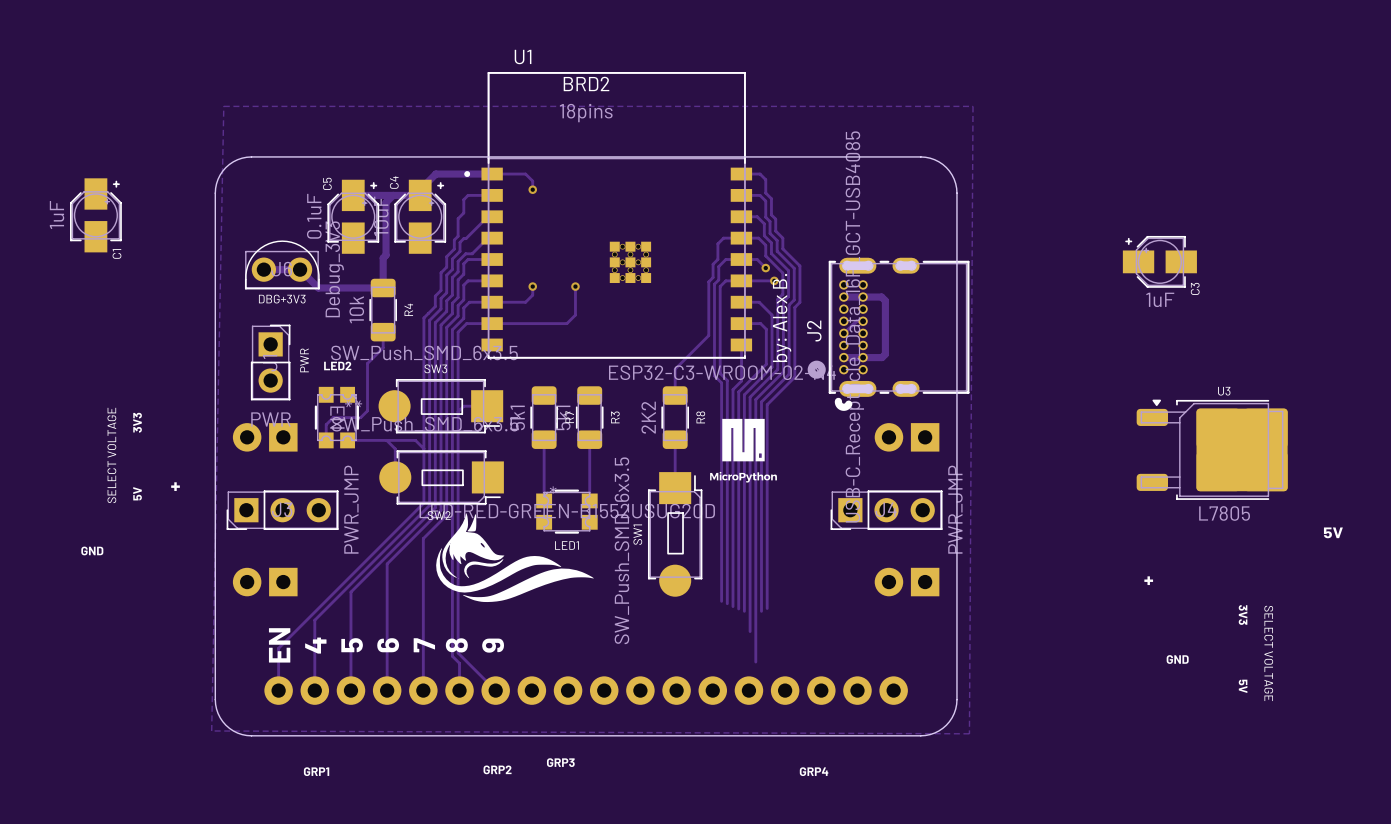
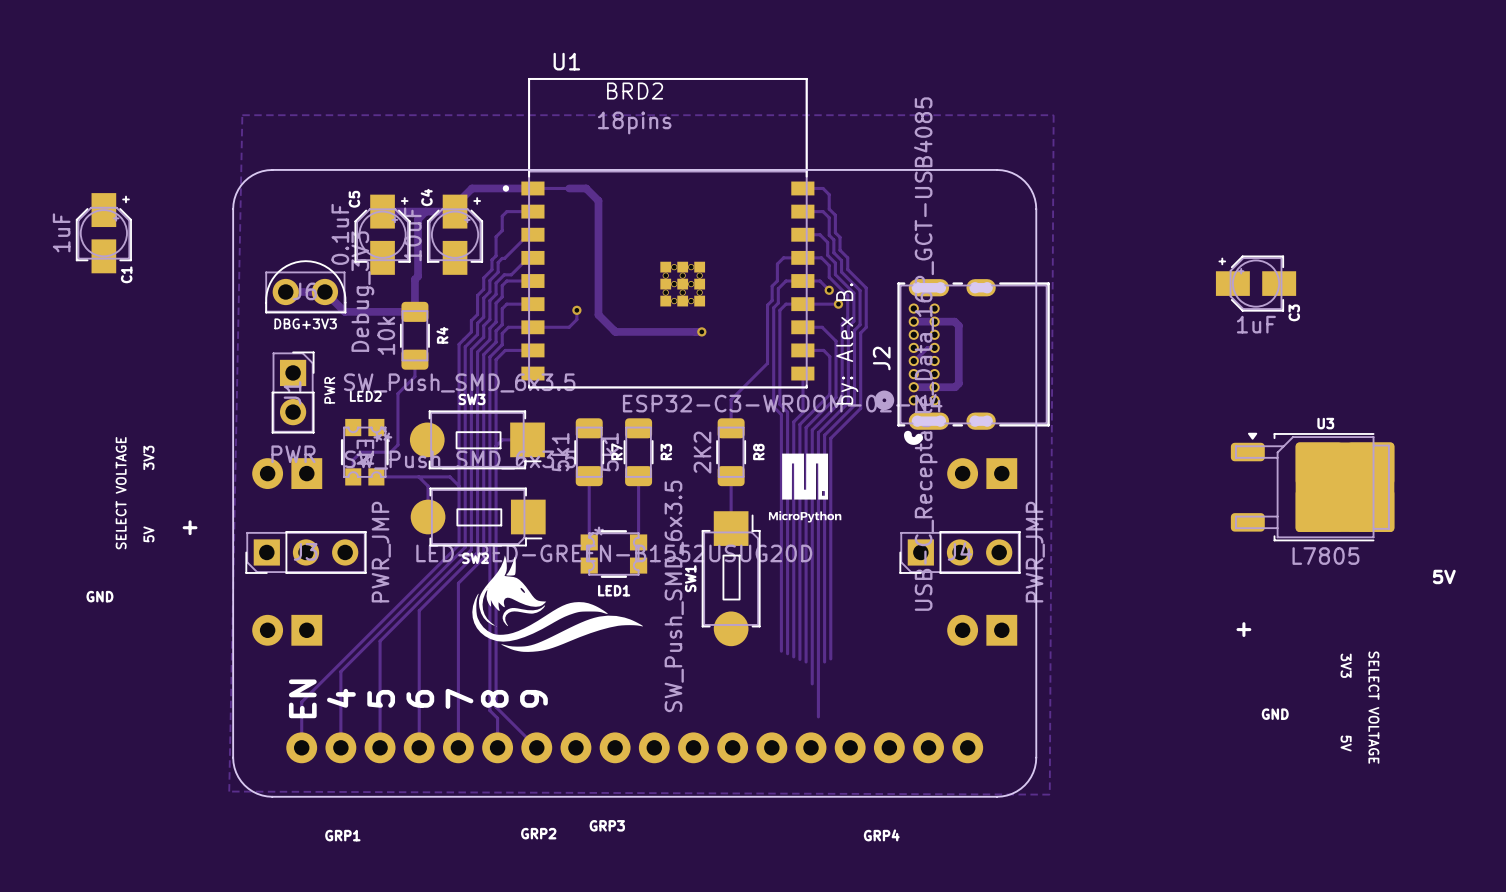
track: (525, 174) (532, 181) (532, 189) -> (569, 188) (586, 188) (598, 200) (598, 314) (615, 331) (701, 331)
via: (532, 189) -> none
track: (575, 286) (575, 315) (566, 323) (492, 323) -> none
via position: (575, 286) -> (701, 331)

